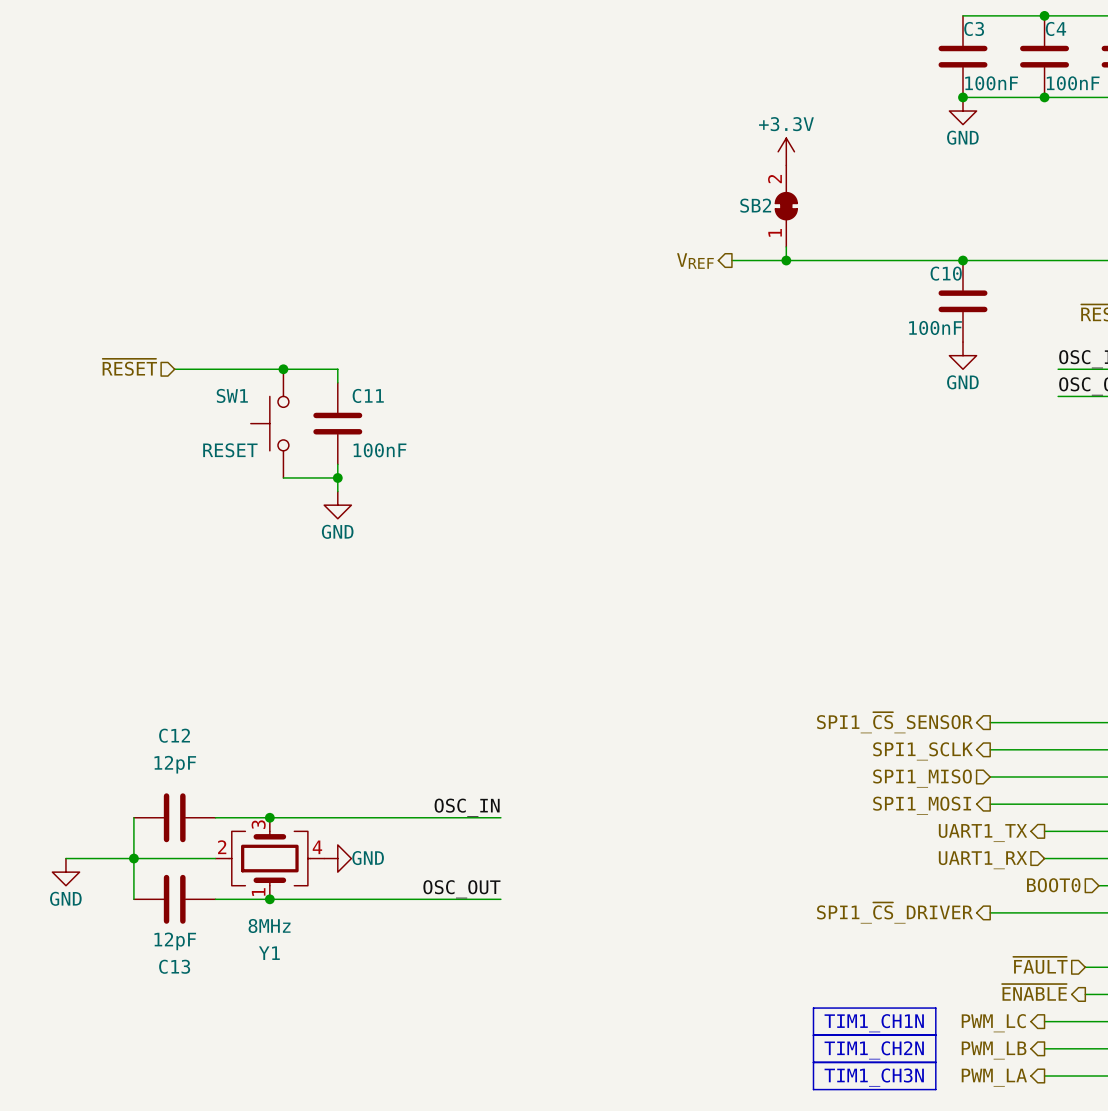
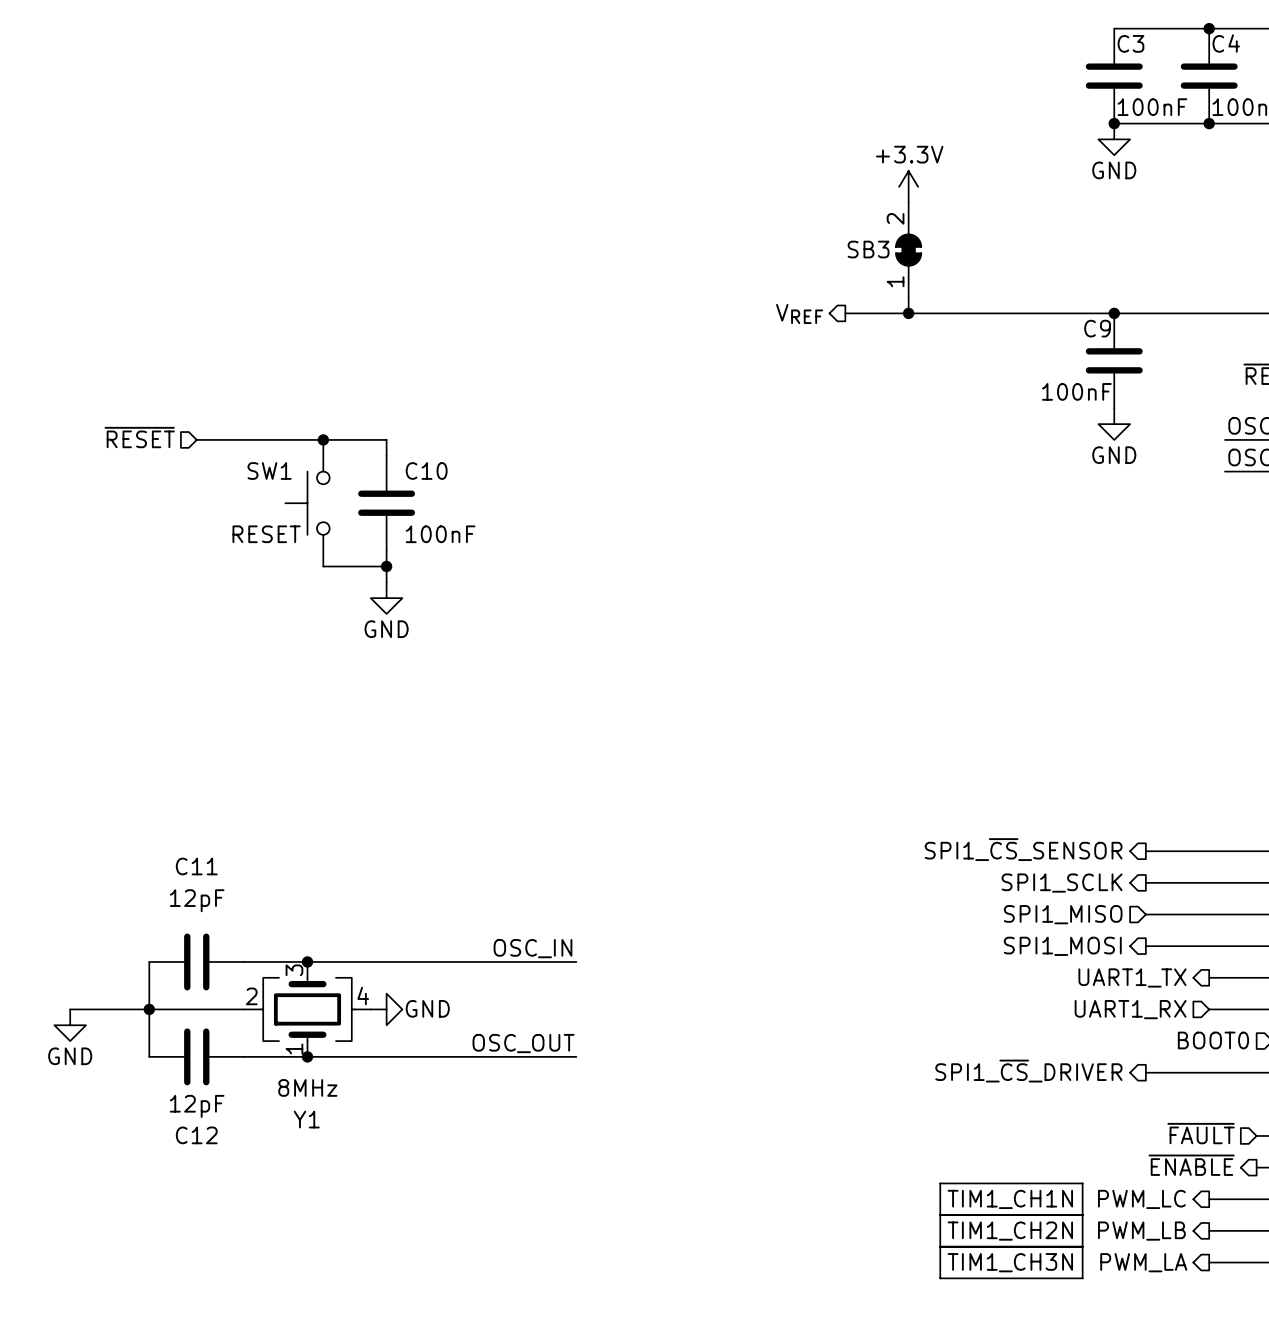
SB2 name: SB2 (755, 205) -> SB3 (868, 249)
C10 name: C10 (946, 273) -> C9 (1097, 328)
C11 name: C11 (368, 395) -> C10 (426, 471)
C12 name: C12 (174, 735) -> C11 (196, 866)
C13 name: C13 (174, 966) -> C12 (196, 1135)

